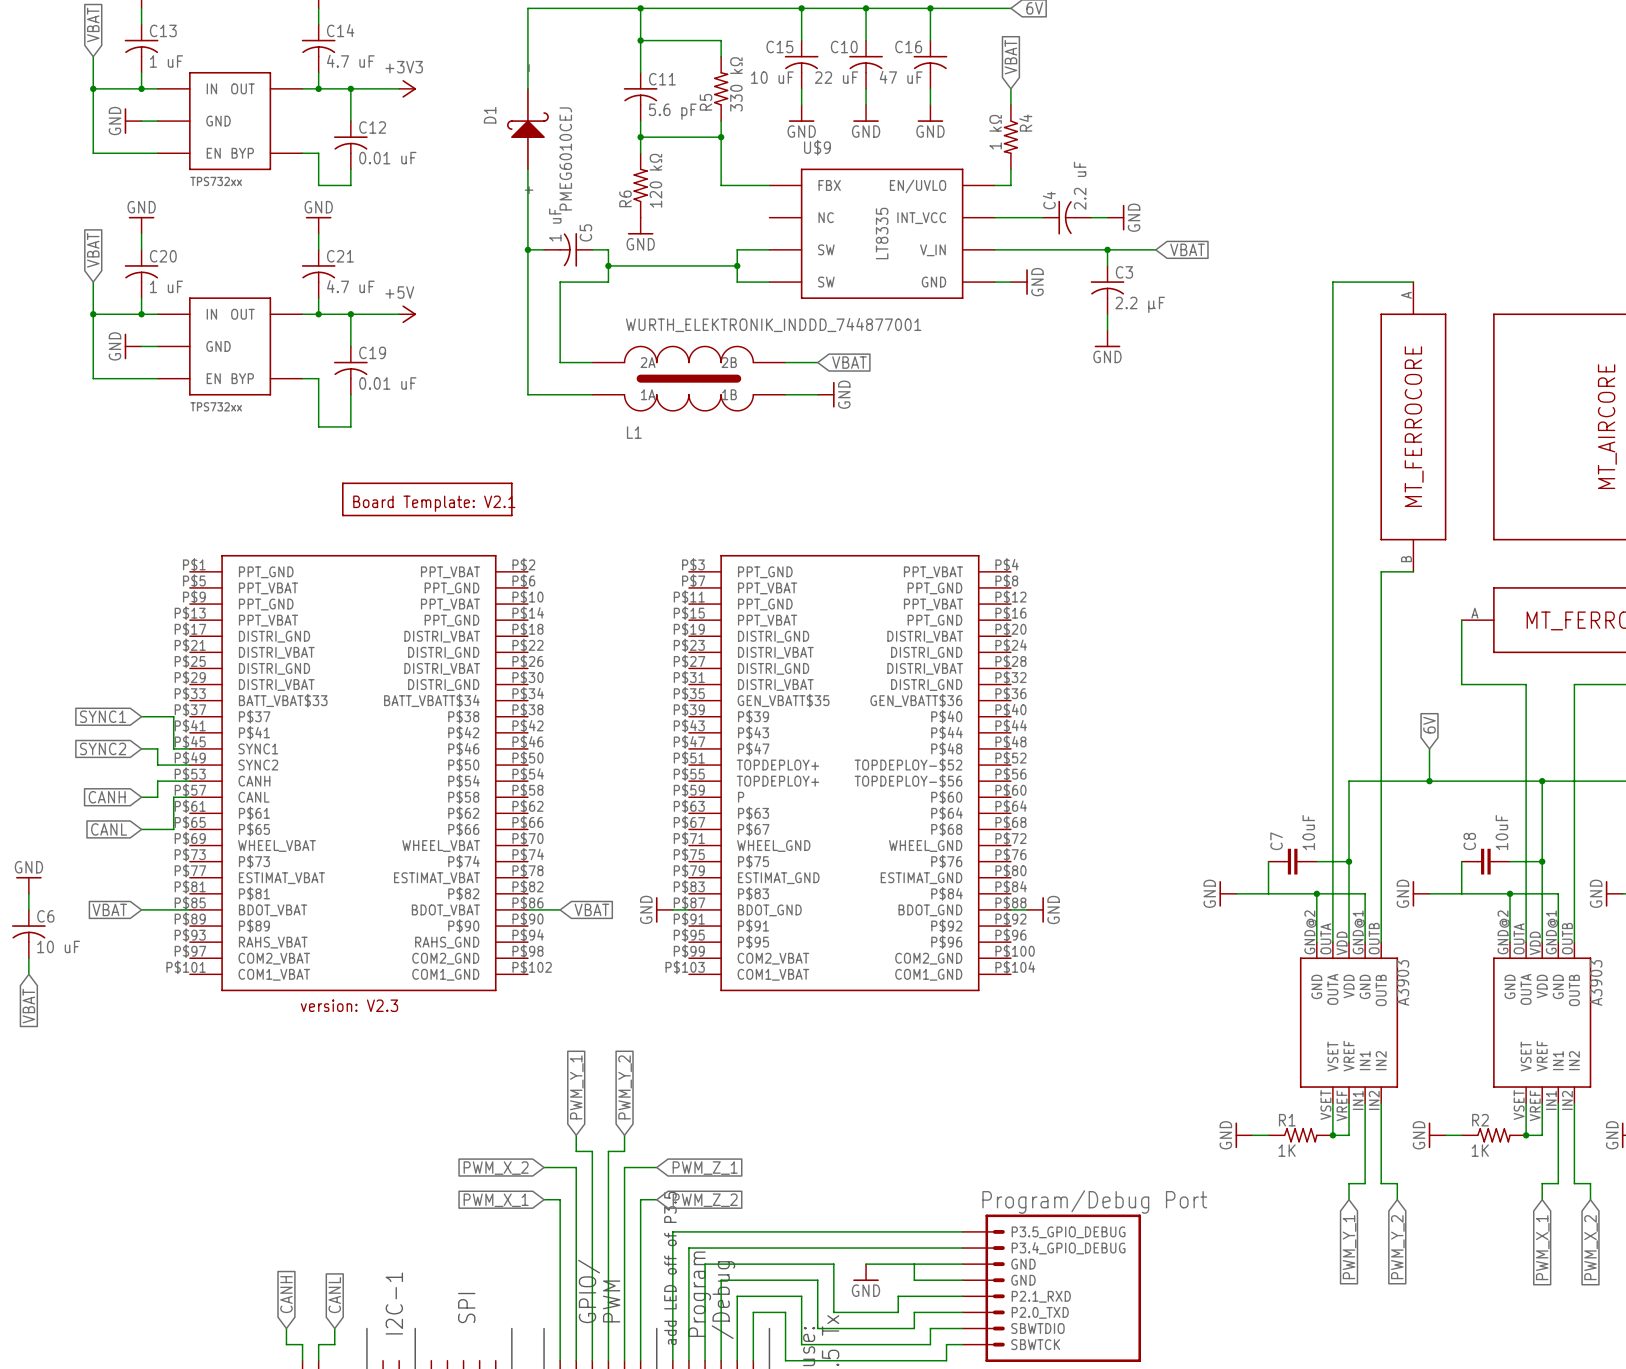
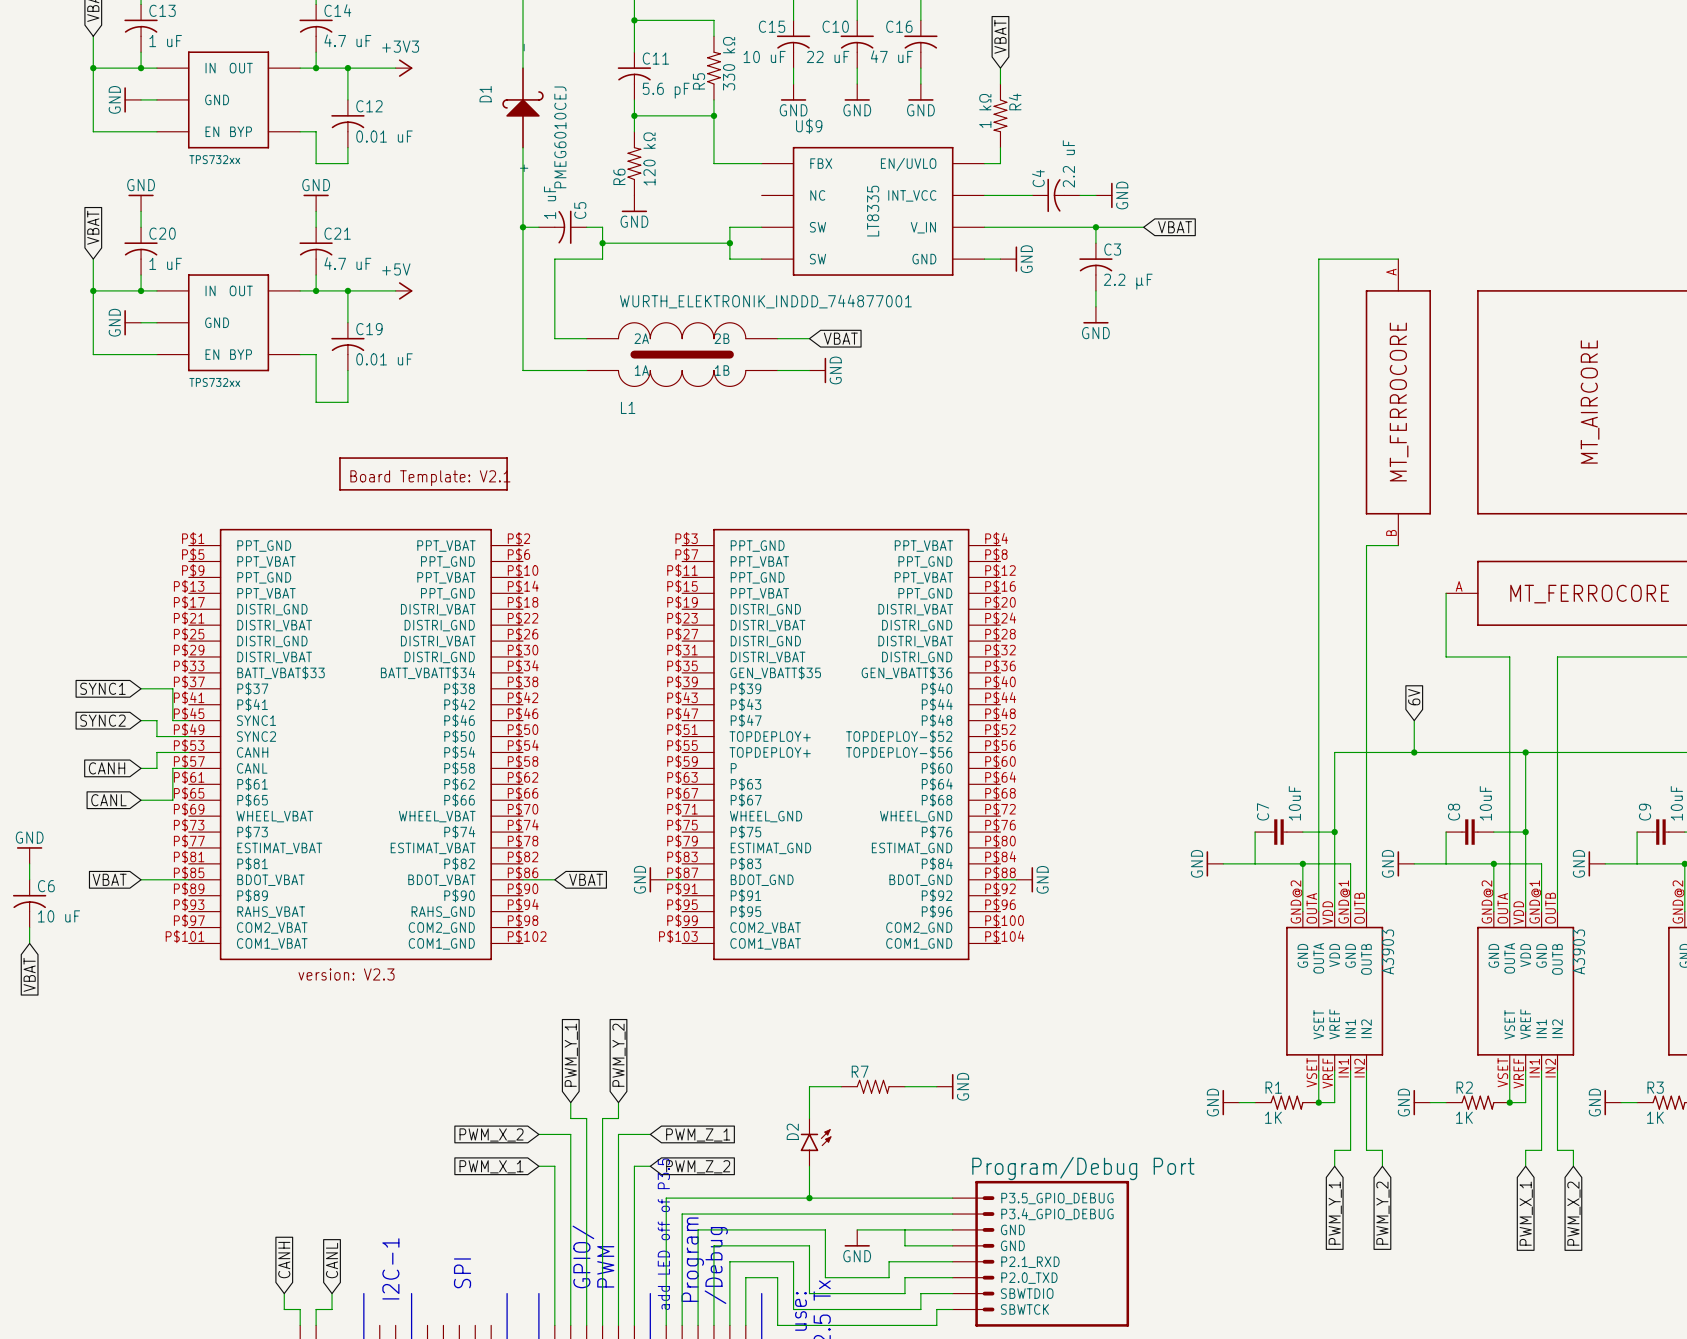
wire: none -> (841, 1086) (809, 1086) (809, 1118)
R7: none -> (873, 1086)
wire: none -> (904, 1086) (936, 1086)
power symbol: none -> GND (945, 1086)
D2: none -> (816, 1142)
wire: none -> (809, 1166) (809, 1198)
junction: none -> (809, 1198)

